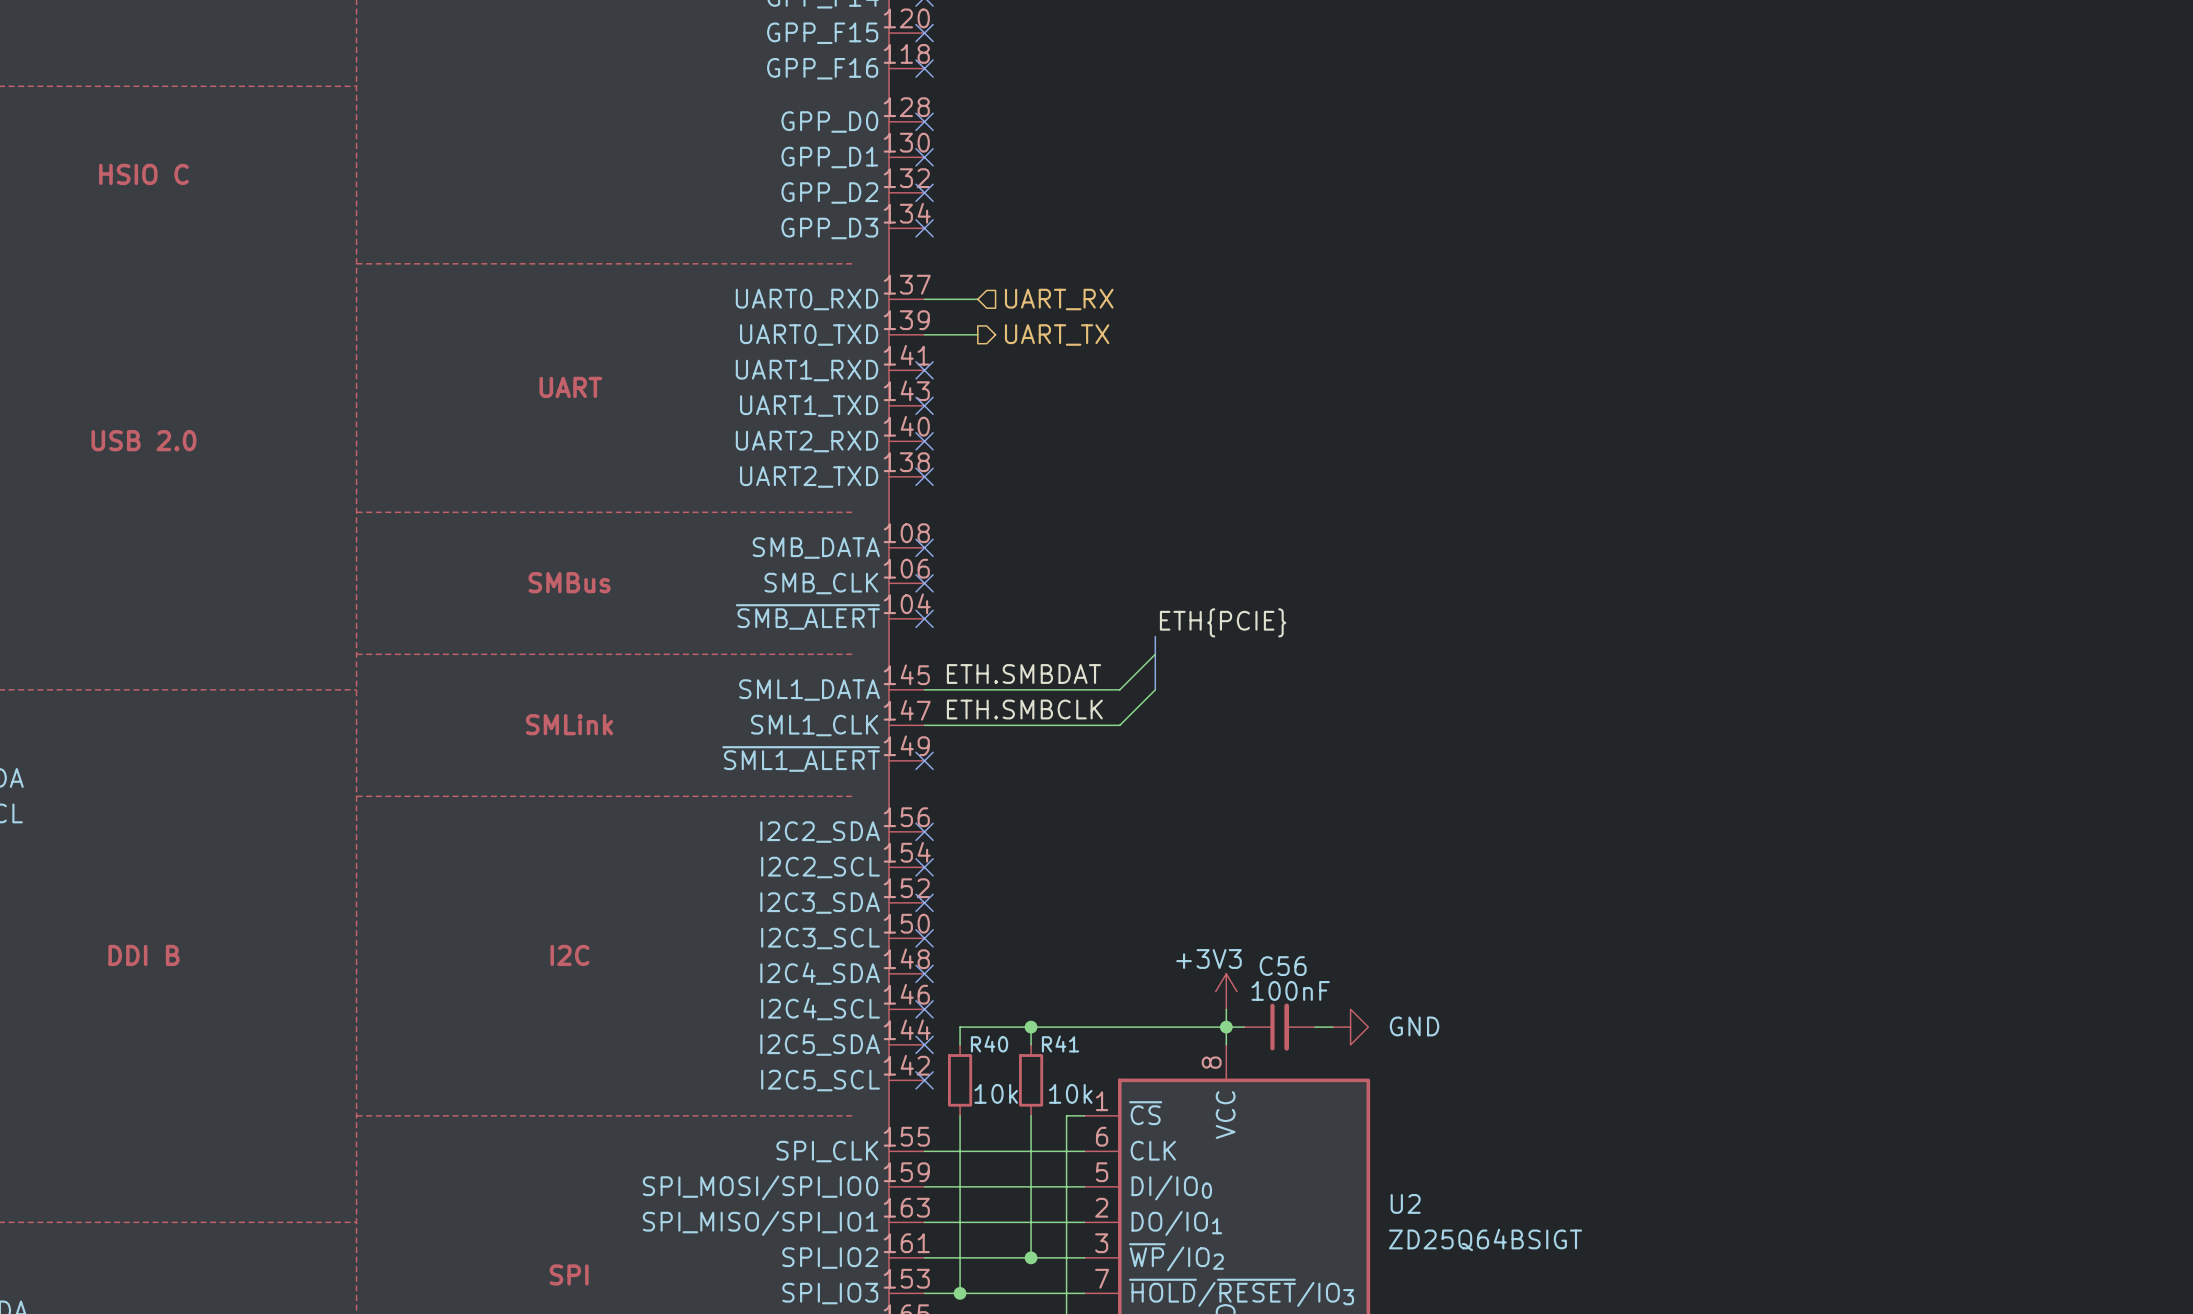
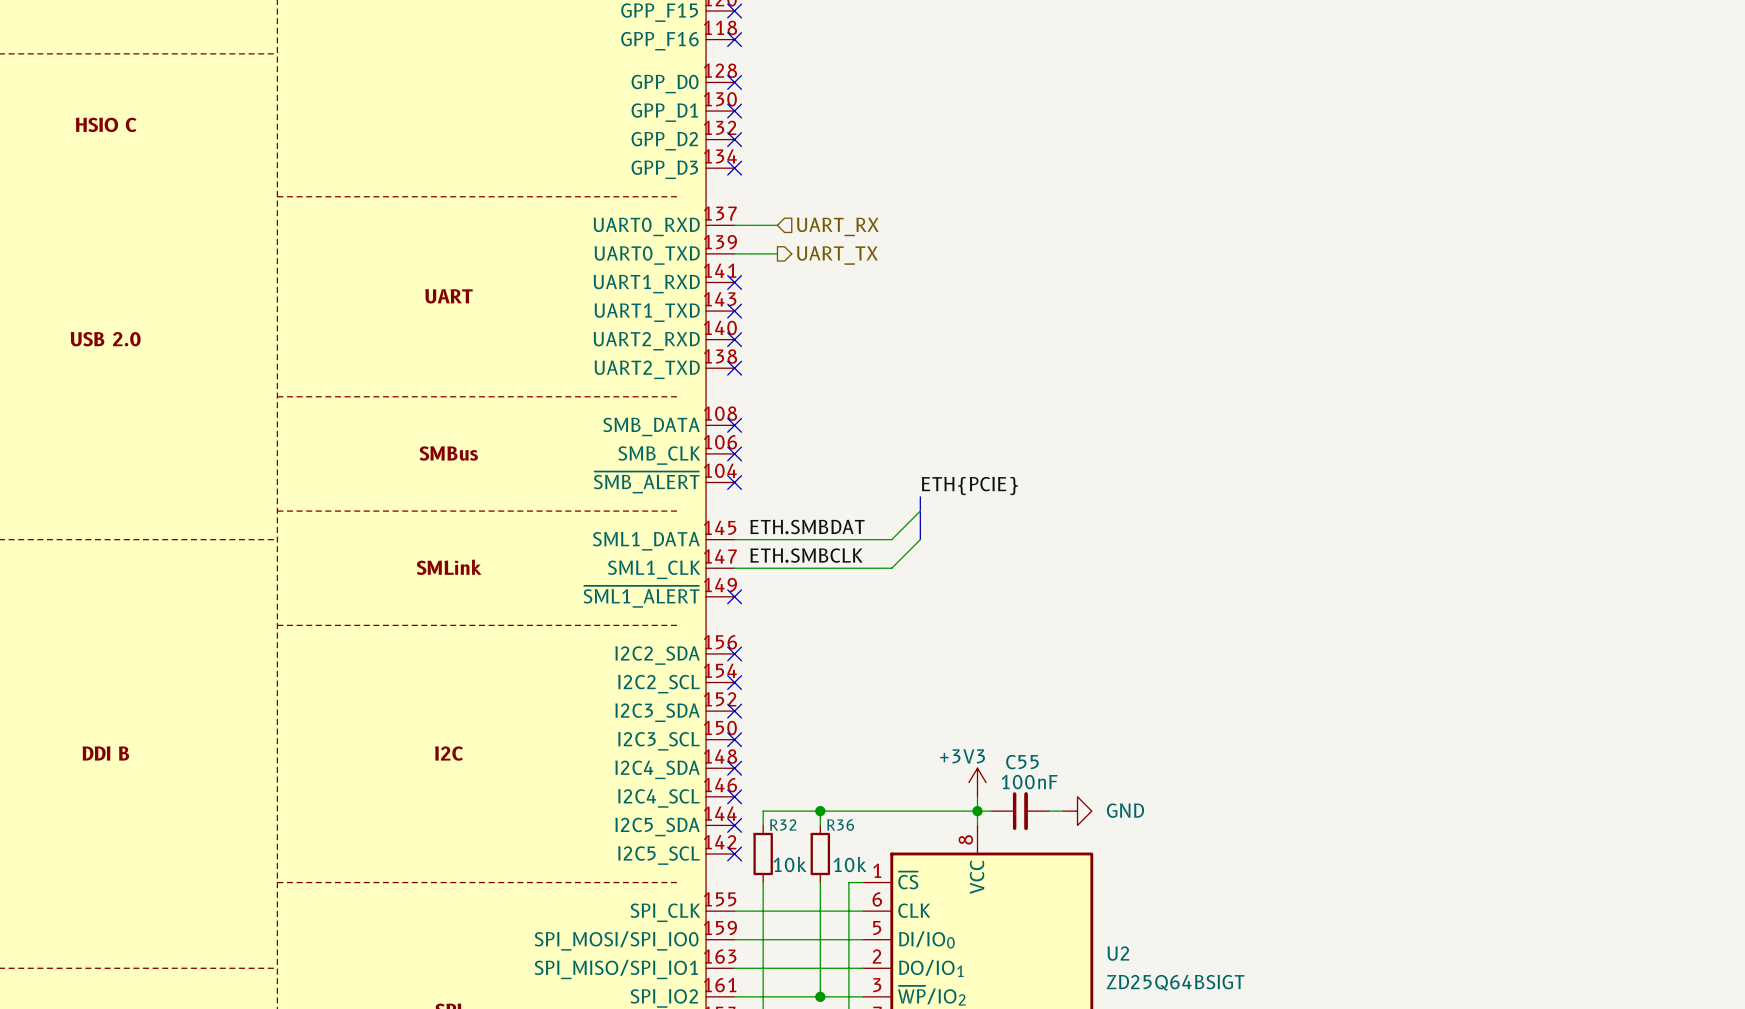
C56 name: C56 (1283, 966) -> C55 (1022, 762)
R40 name: R40 (989, 1043) -> R32 (783, 824)
R41 name: R41 (1060, 1043) -> R36 (840, 825)

